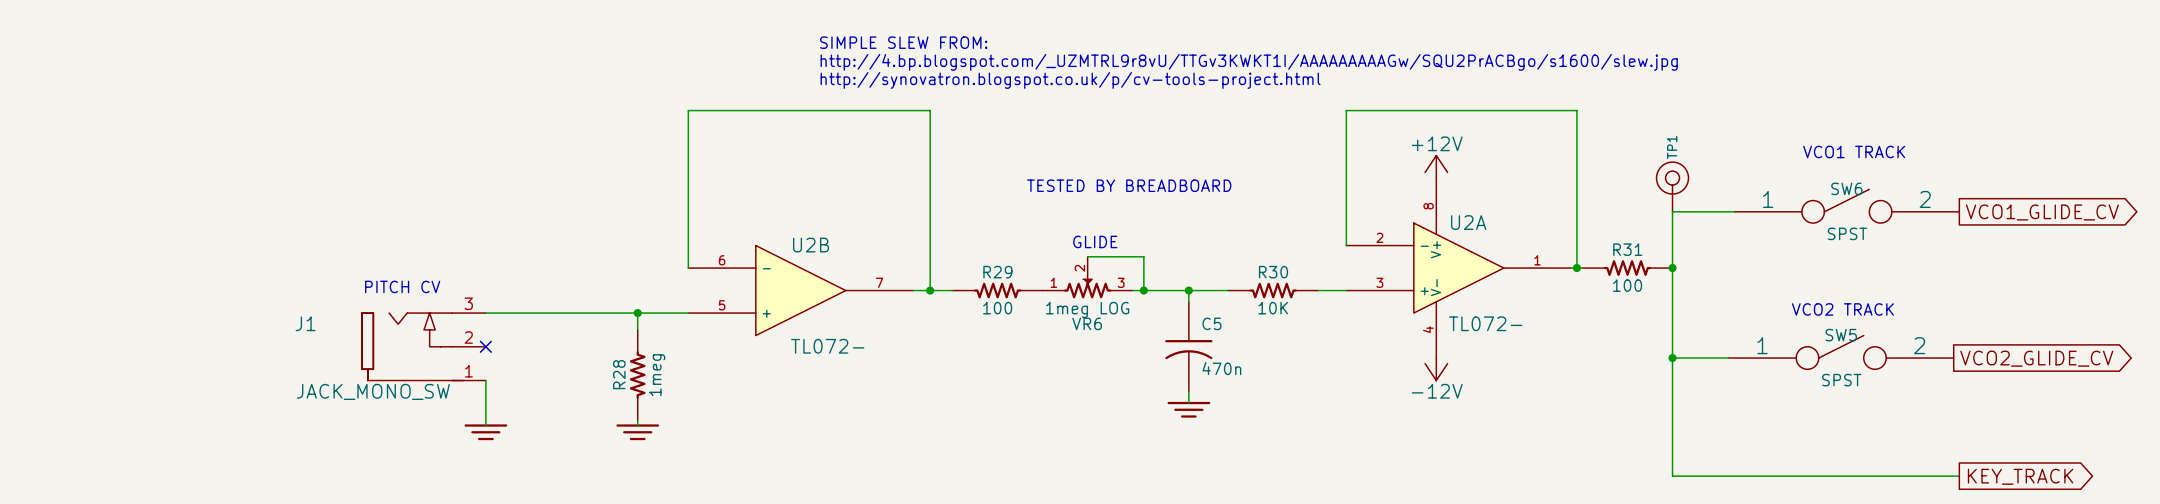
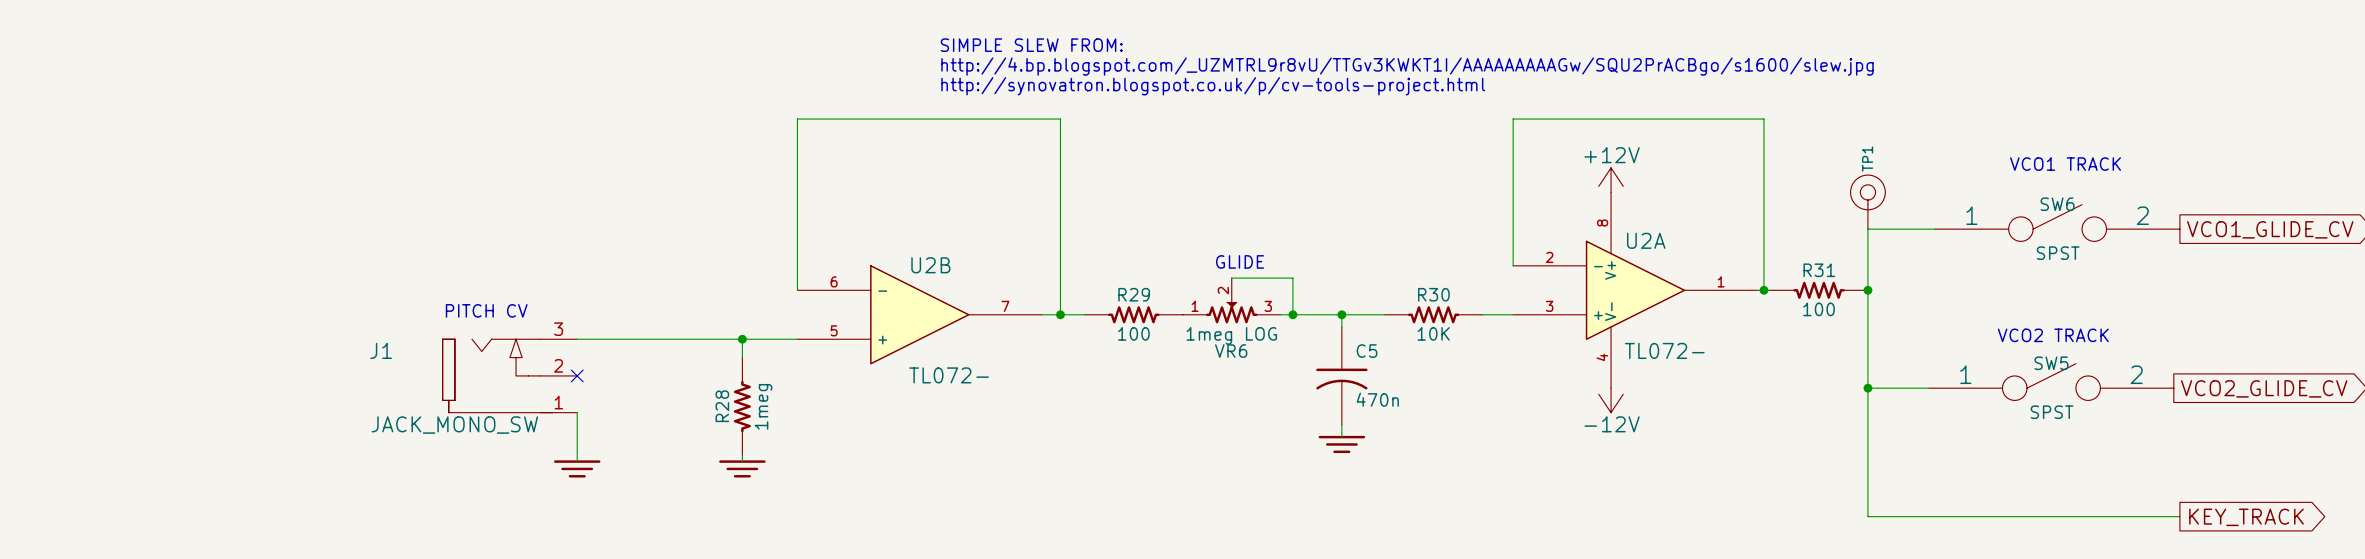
text: TESTED BY BREADBOARD (1129, 185) -> none

